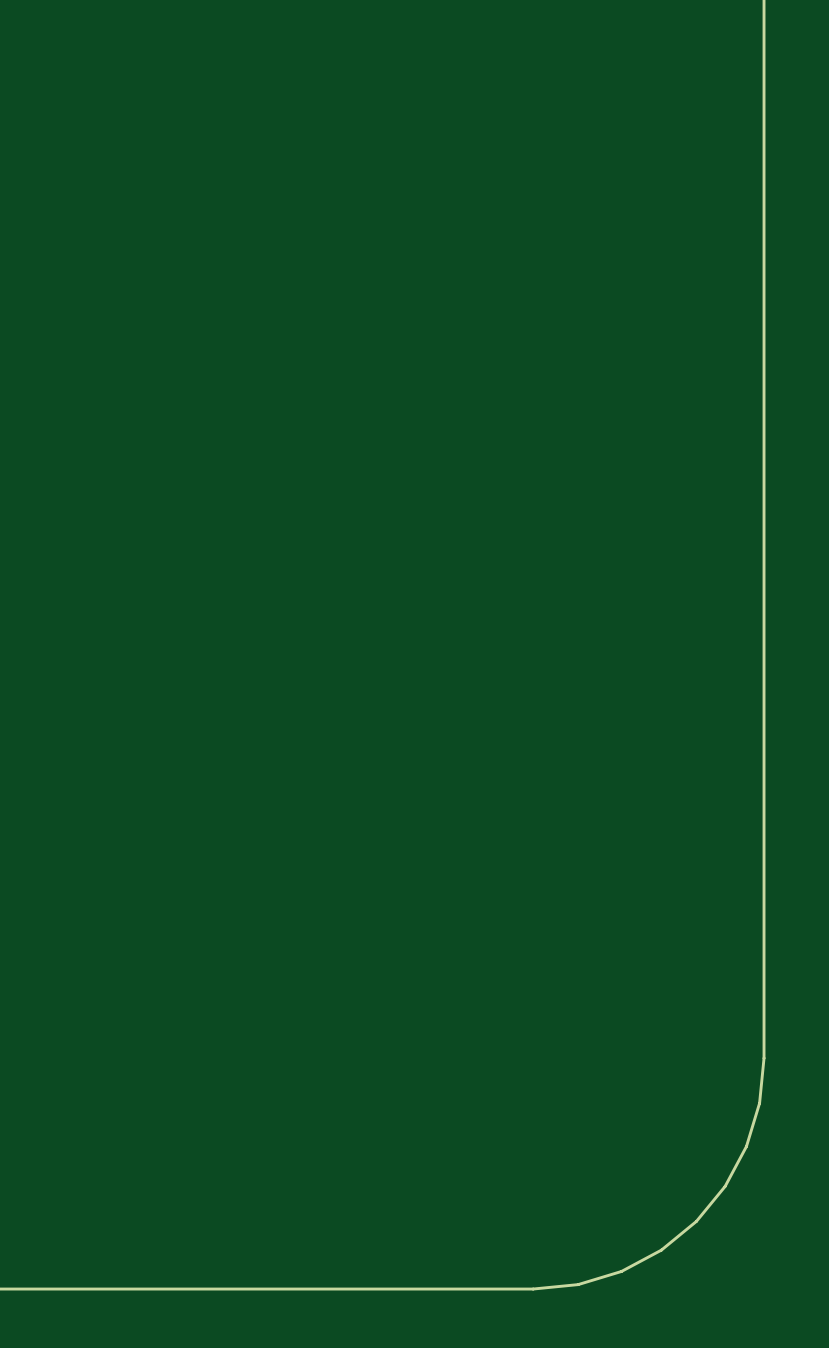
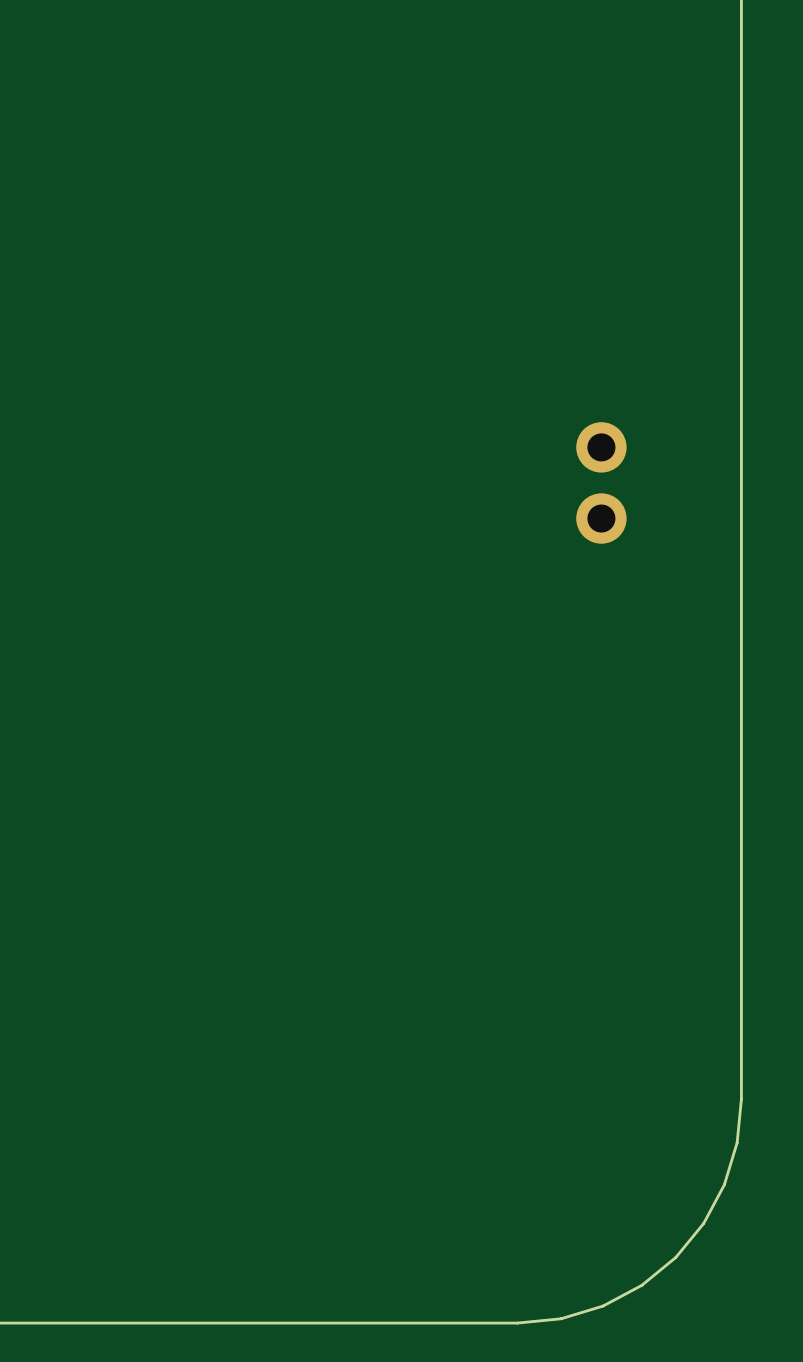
part: none -> (601, 482)

